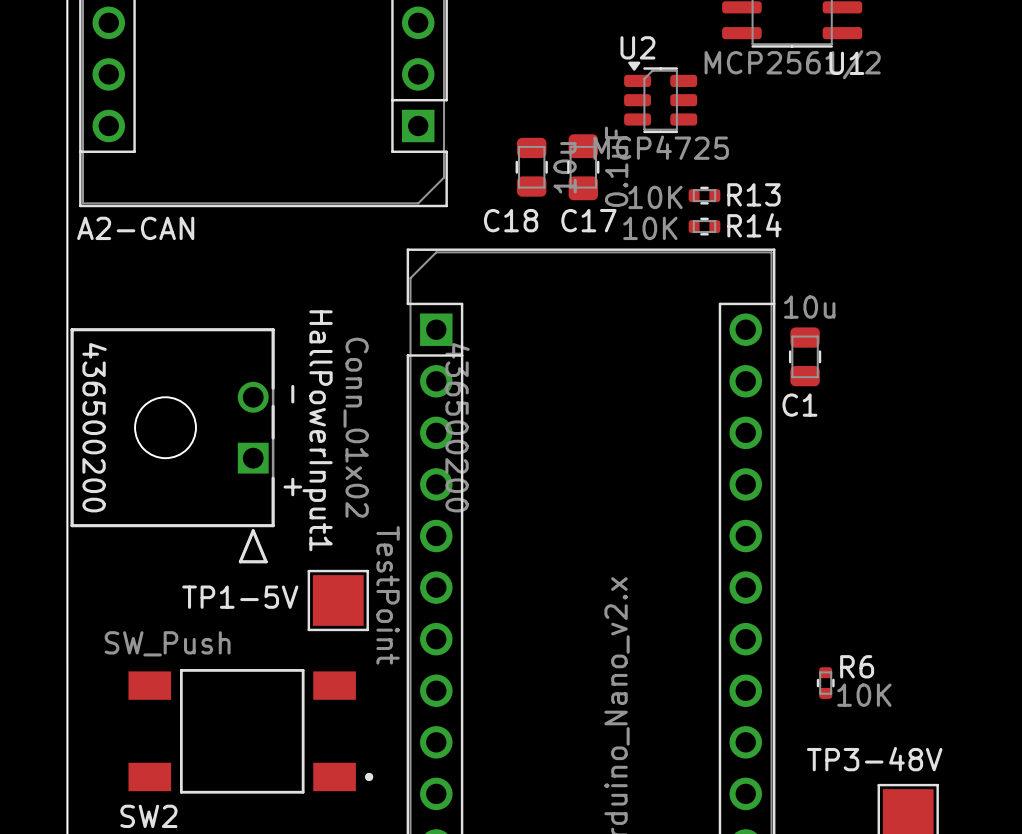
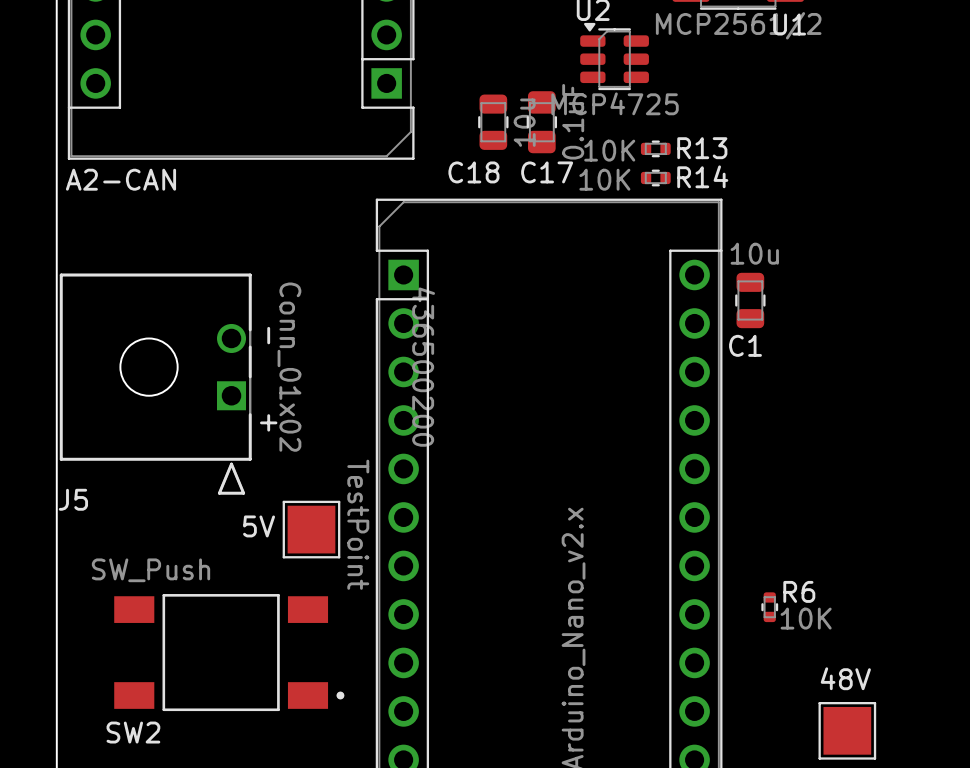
HallPowerInput1 text: 436500200 (94, 427) -> none
HallPowerInput1 value position: Conn_01x02 (356, 427) -> Conn_01x02 (289, 367)
HallPowerInput1 name: HallPowerInput1 (317, 430) -> J5 (73, 499)
TP1-5V name: TP1-5V (240, 597) -> 5V (259, 526)
TP3-48V name: TP3-48V (874, 759) -> 48V (845, 678)

